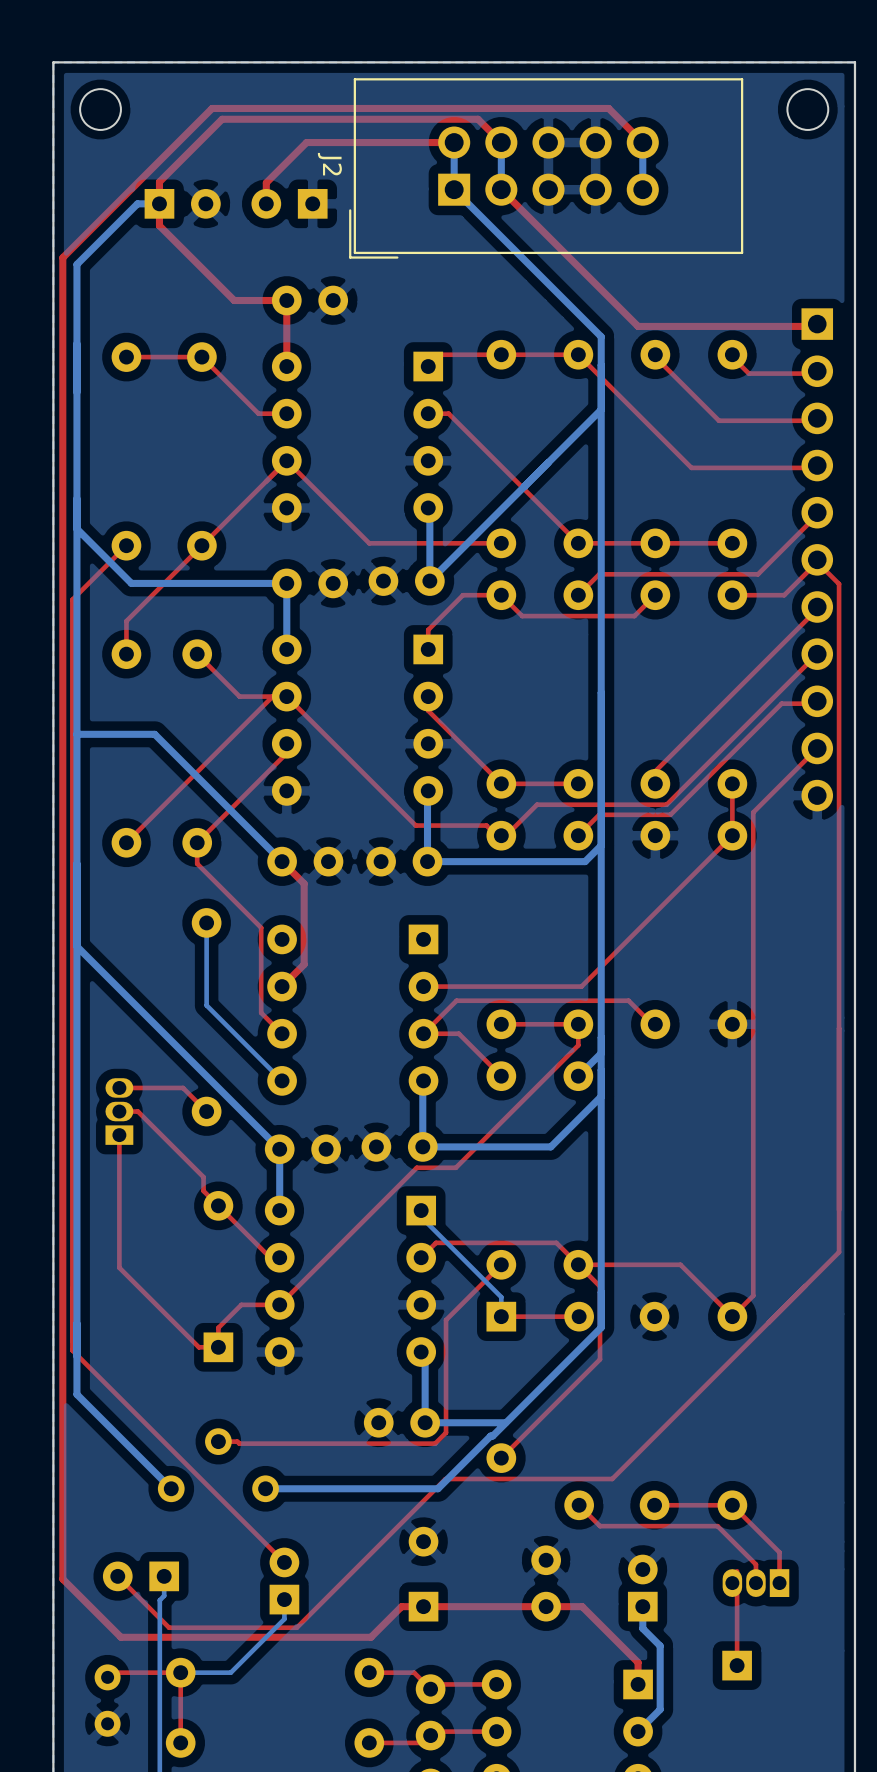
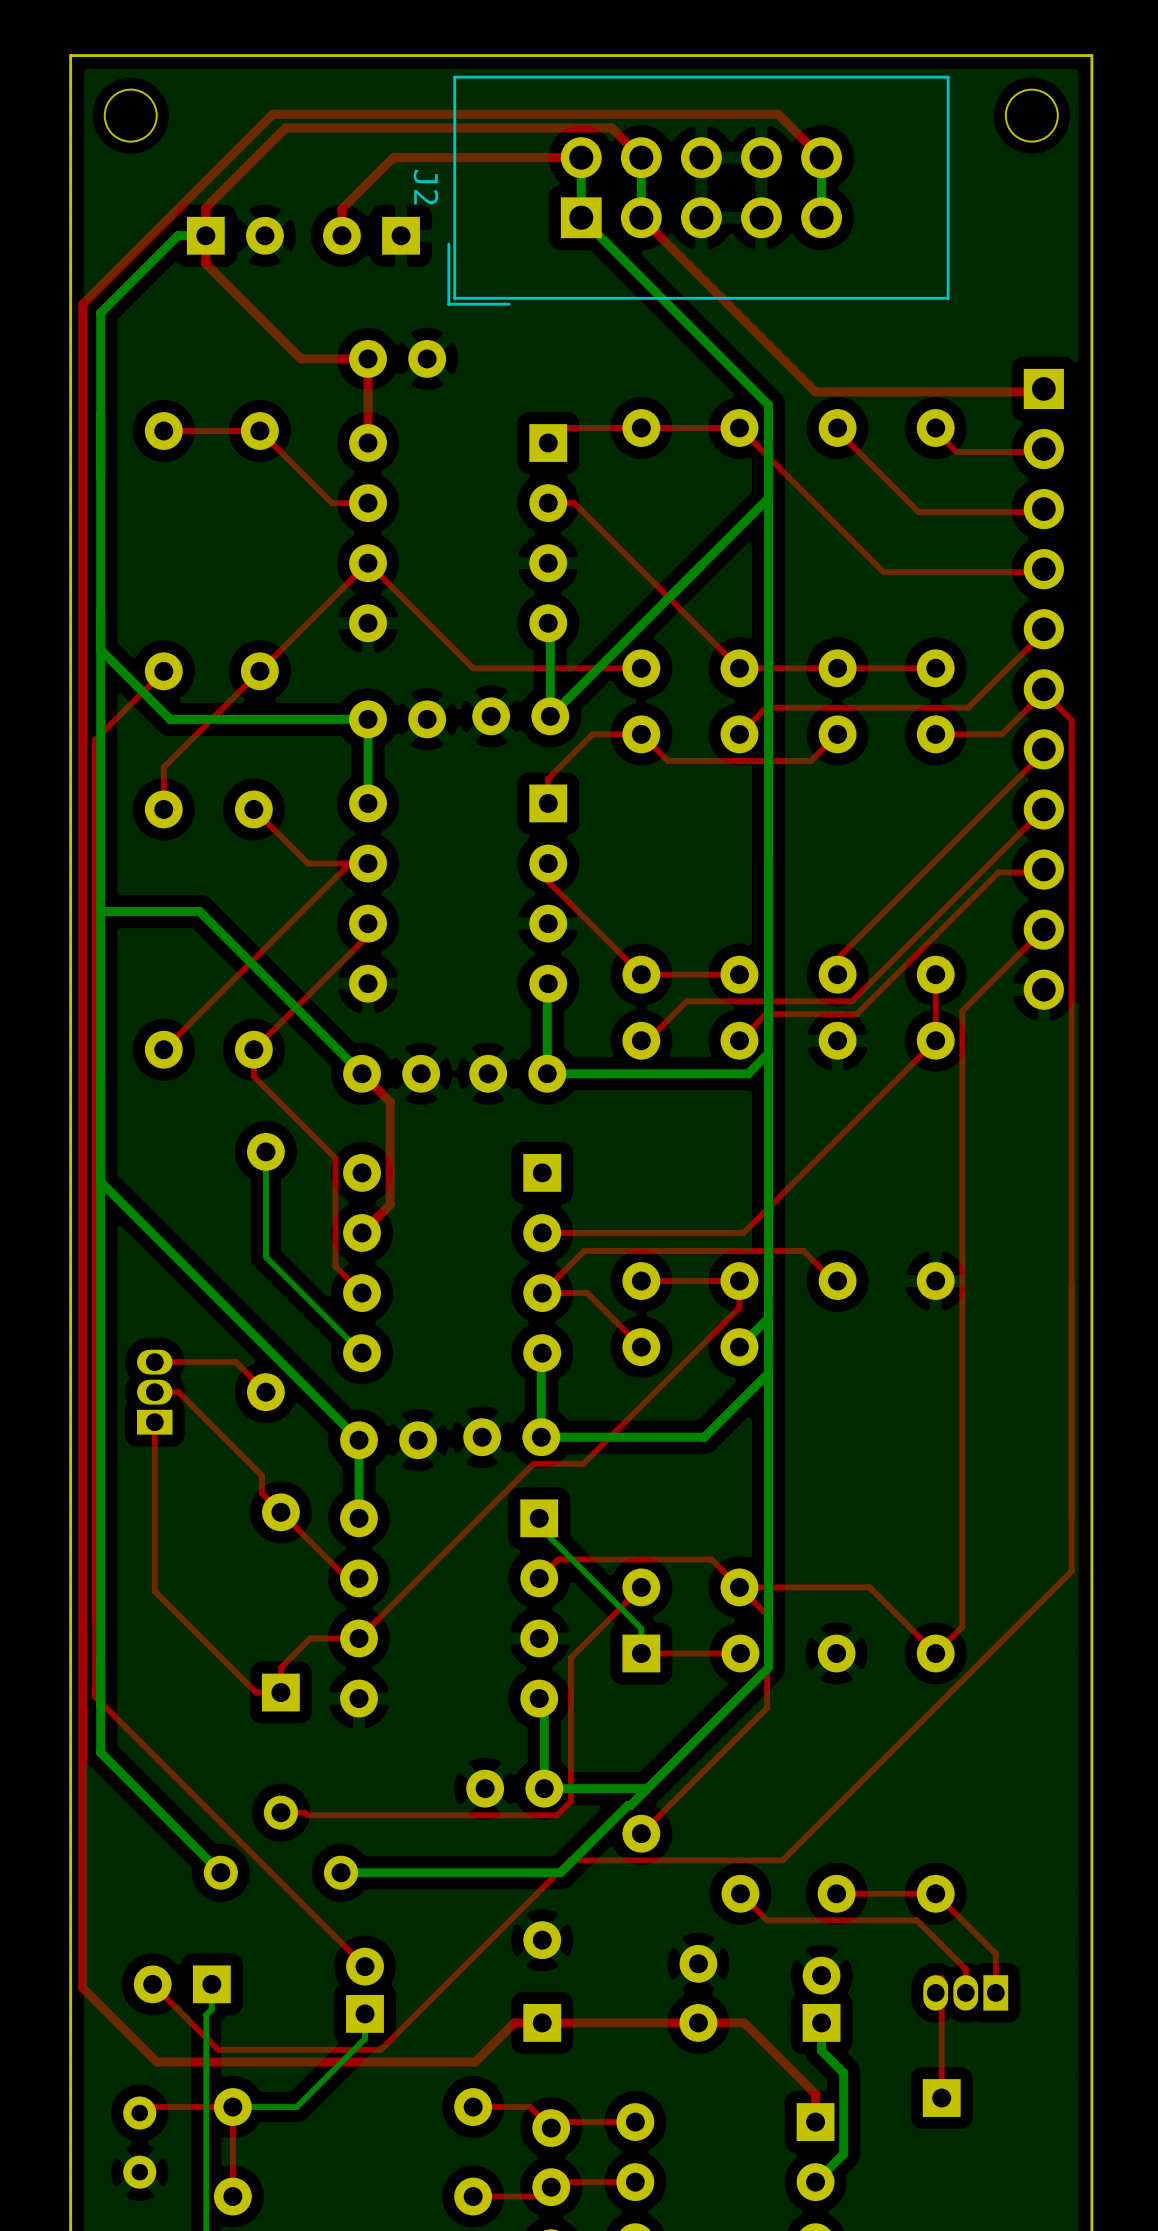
top track: (286, 696) (415, 825) (486, 825) (501, 840) -> none

